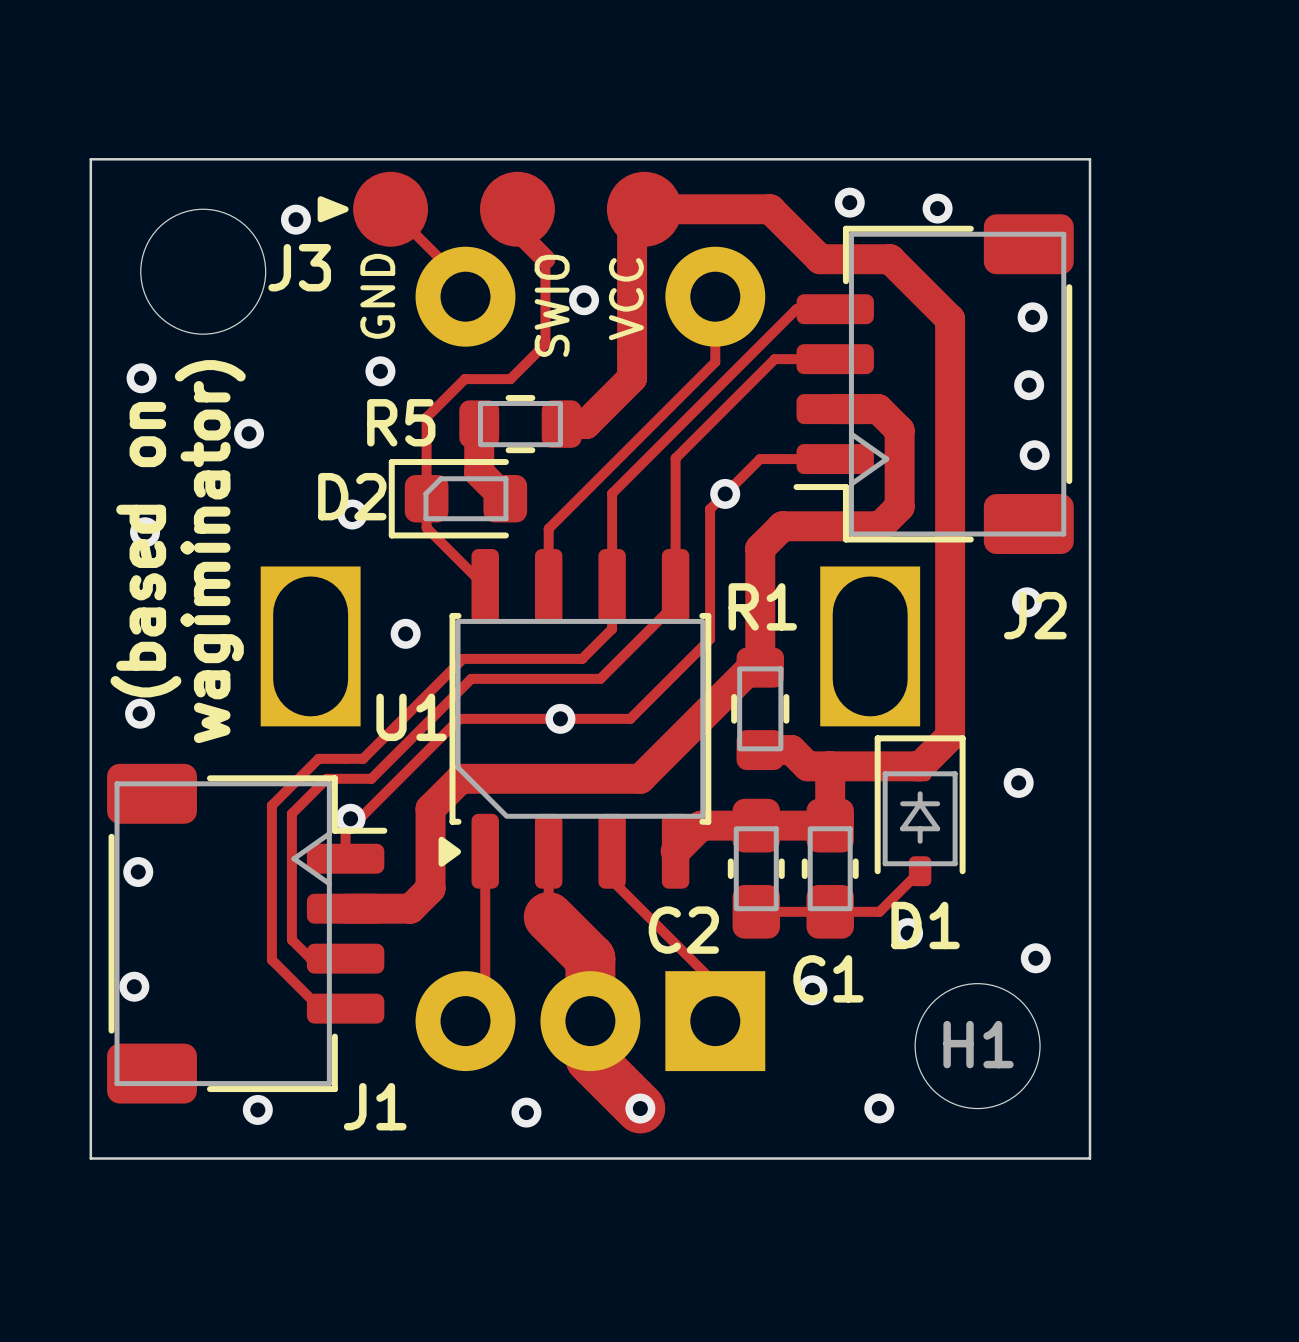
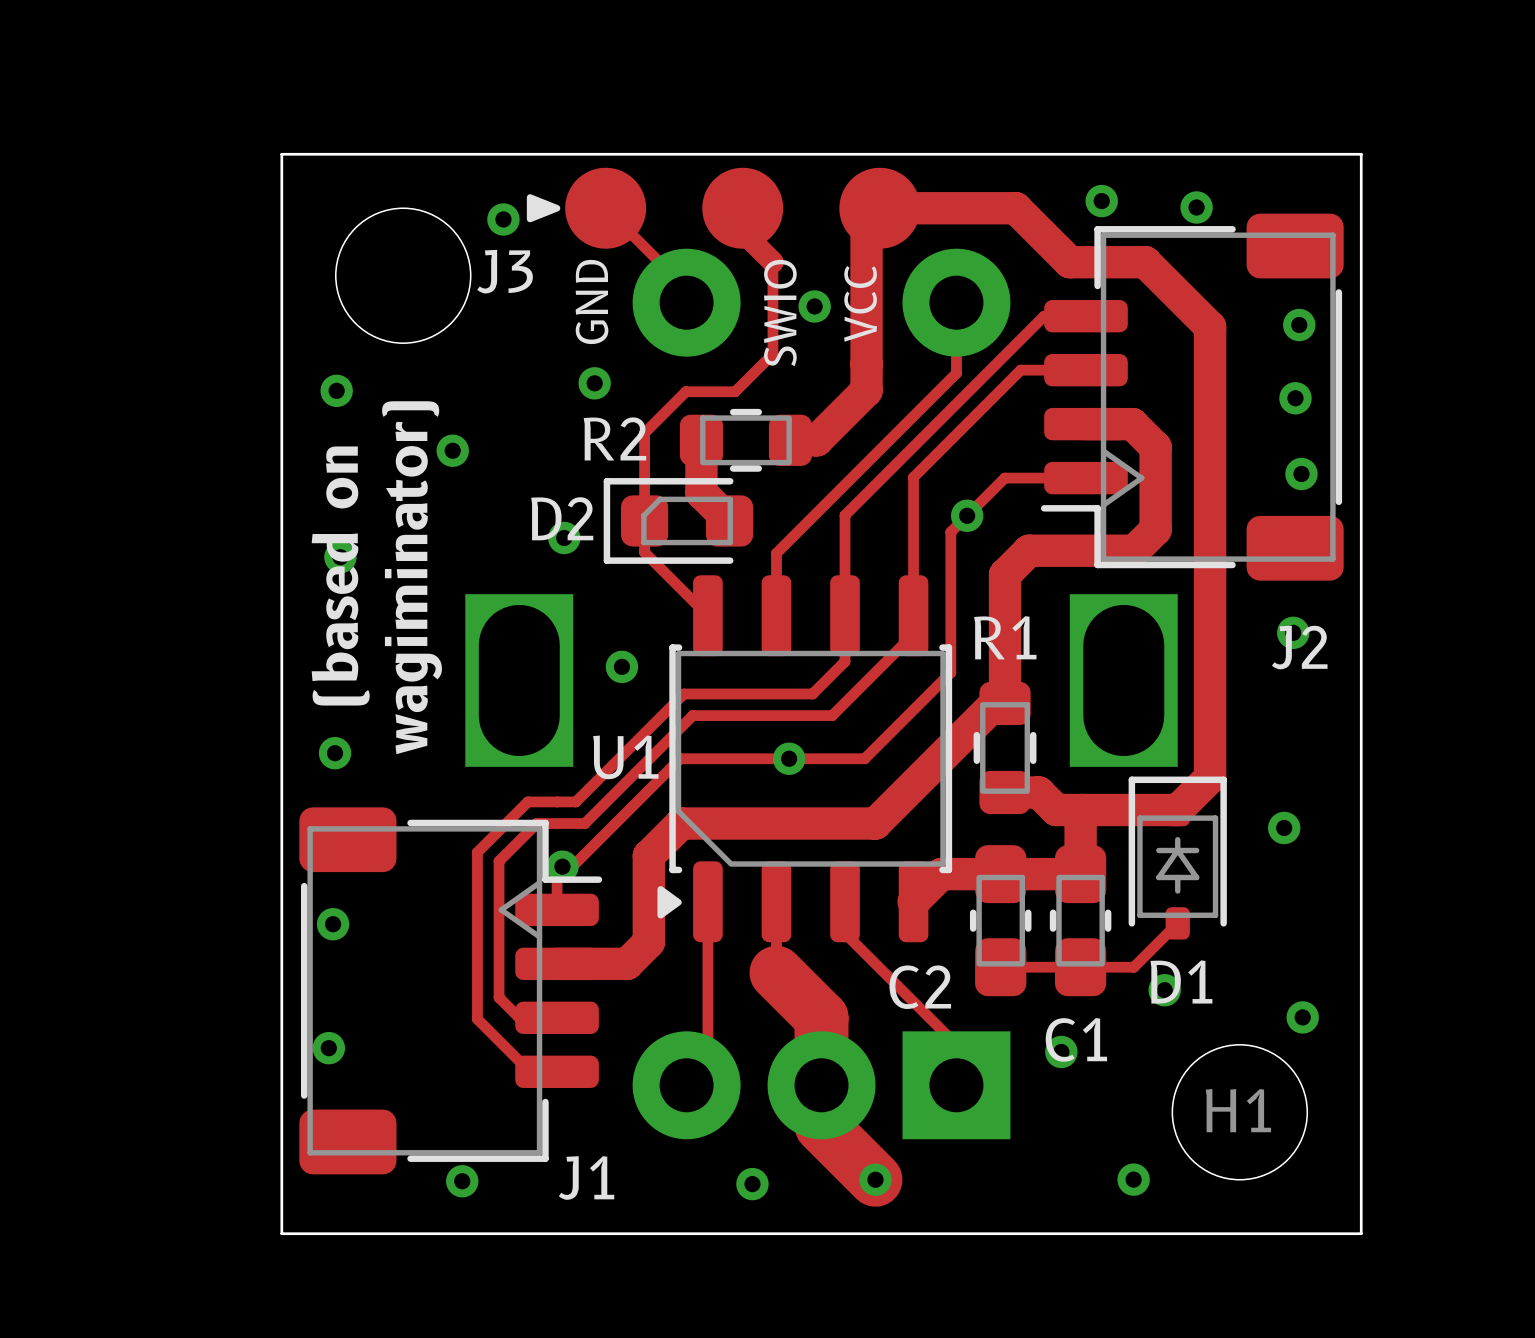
R5 name: R5 (401, 422) -> R2 (614, 438)

